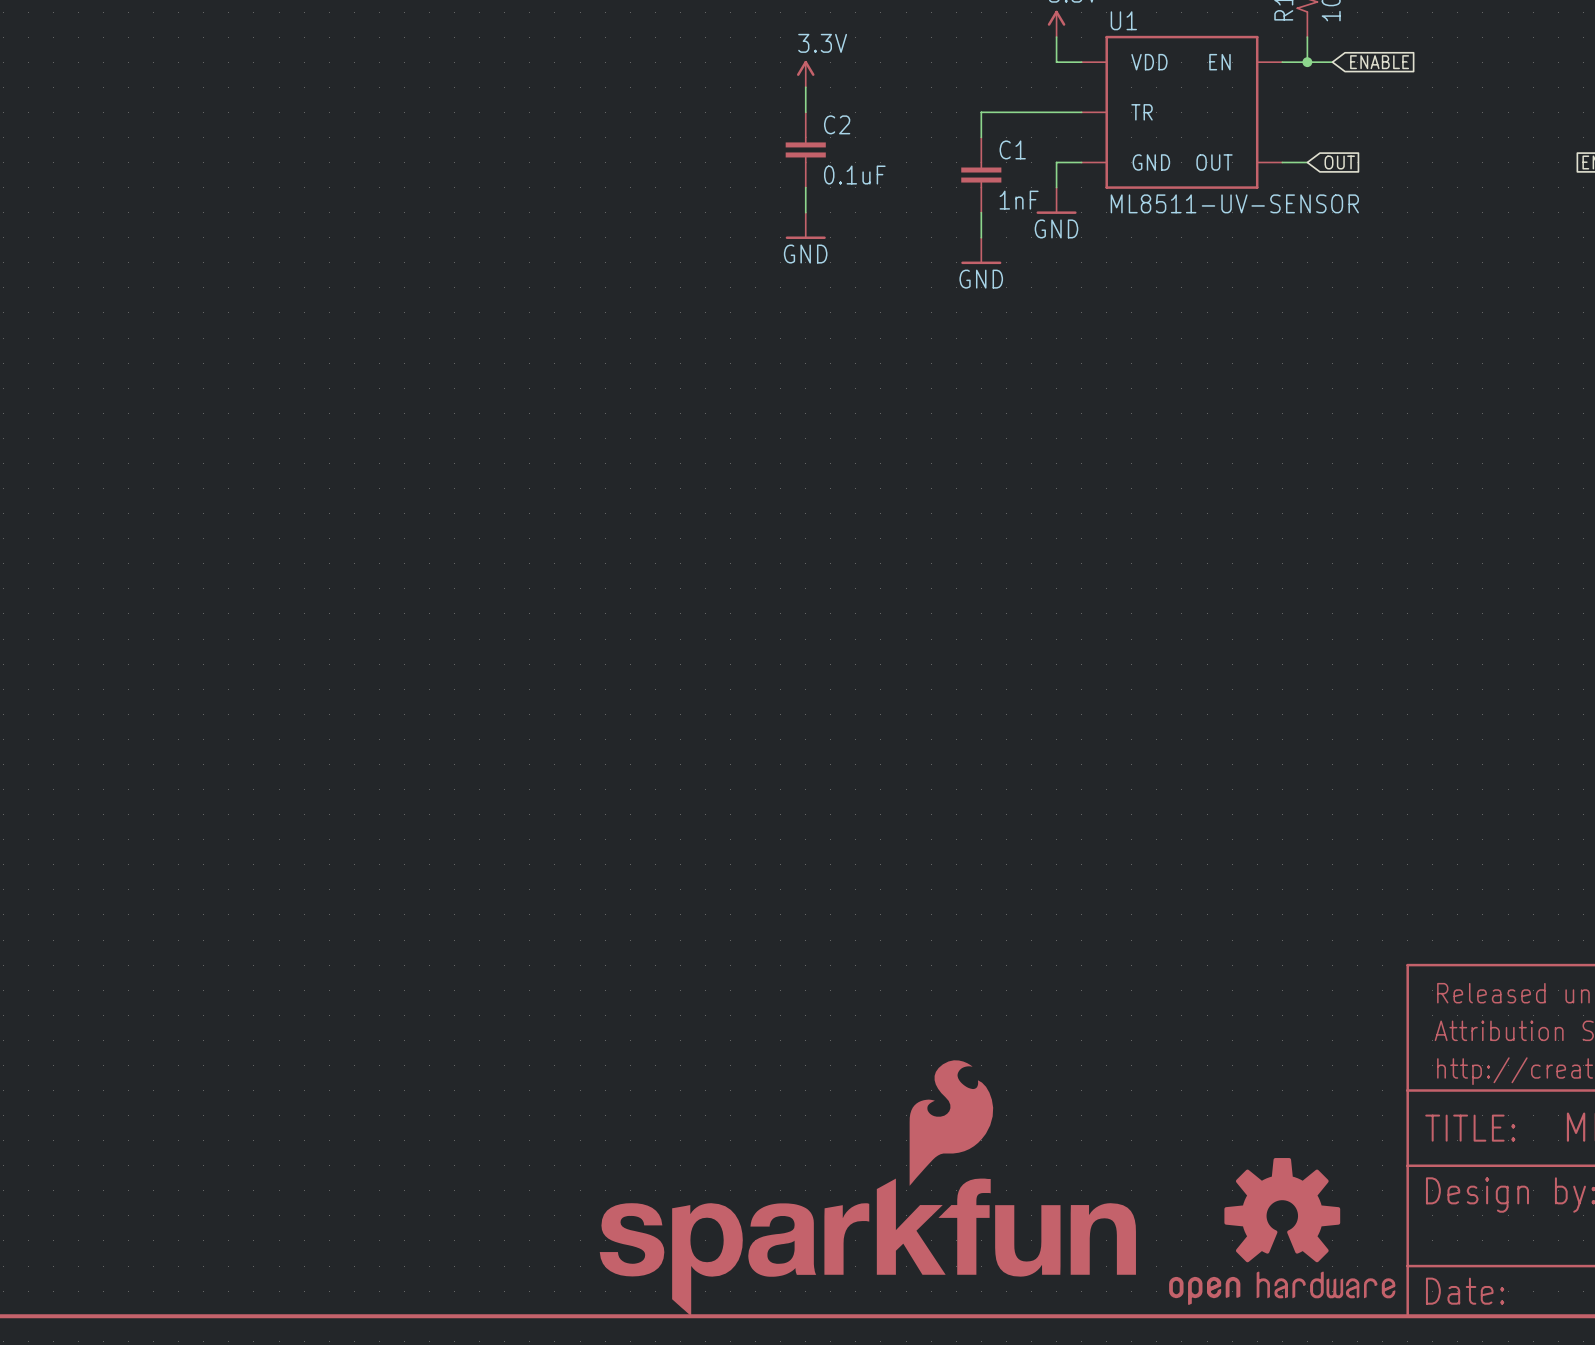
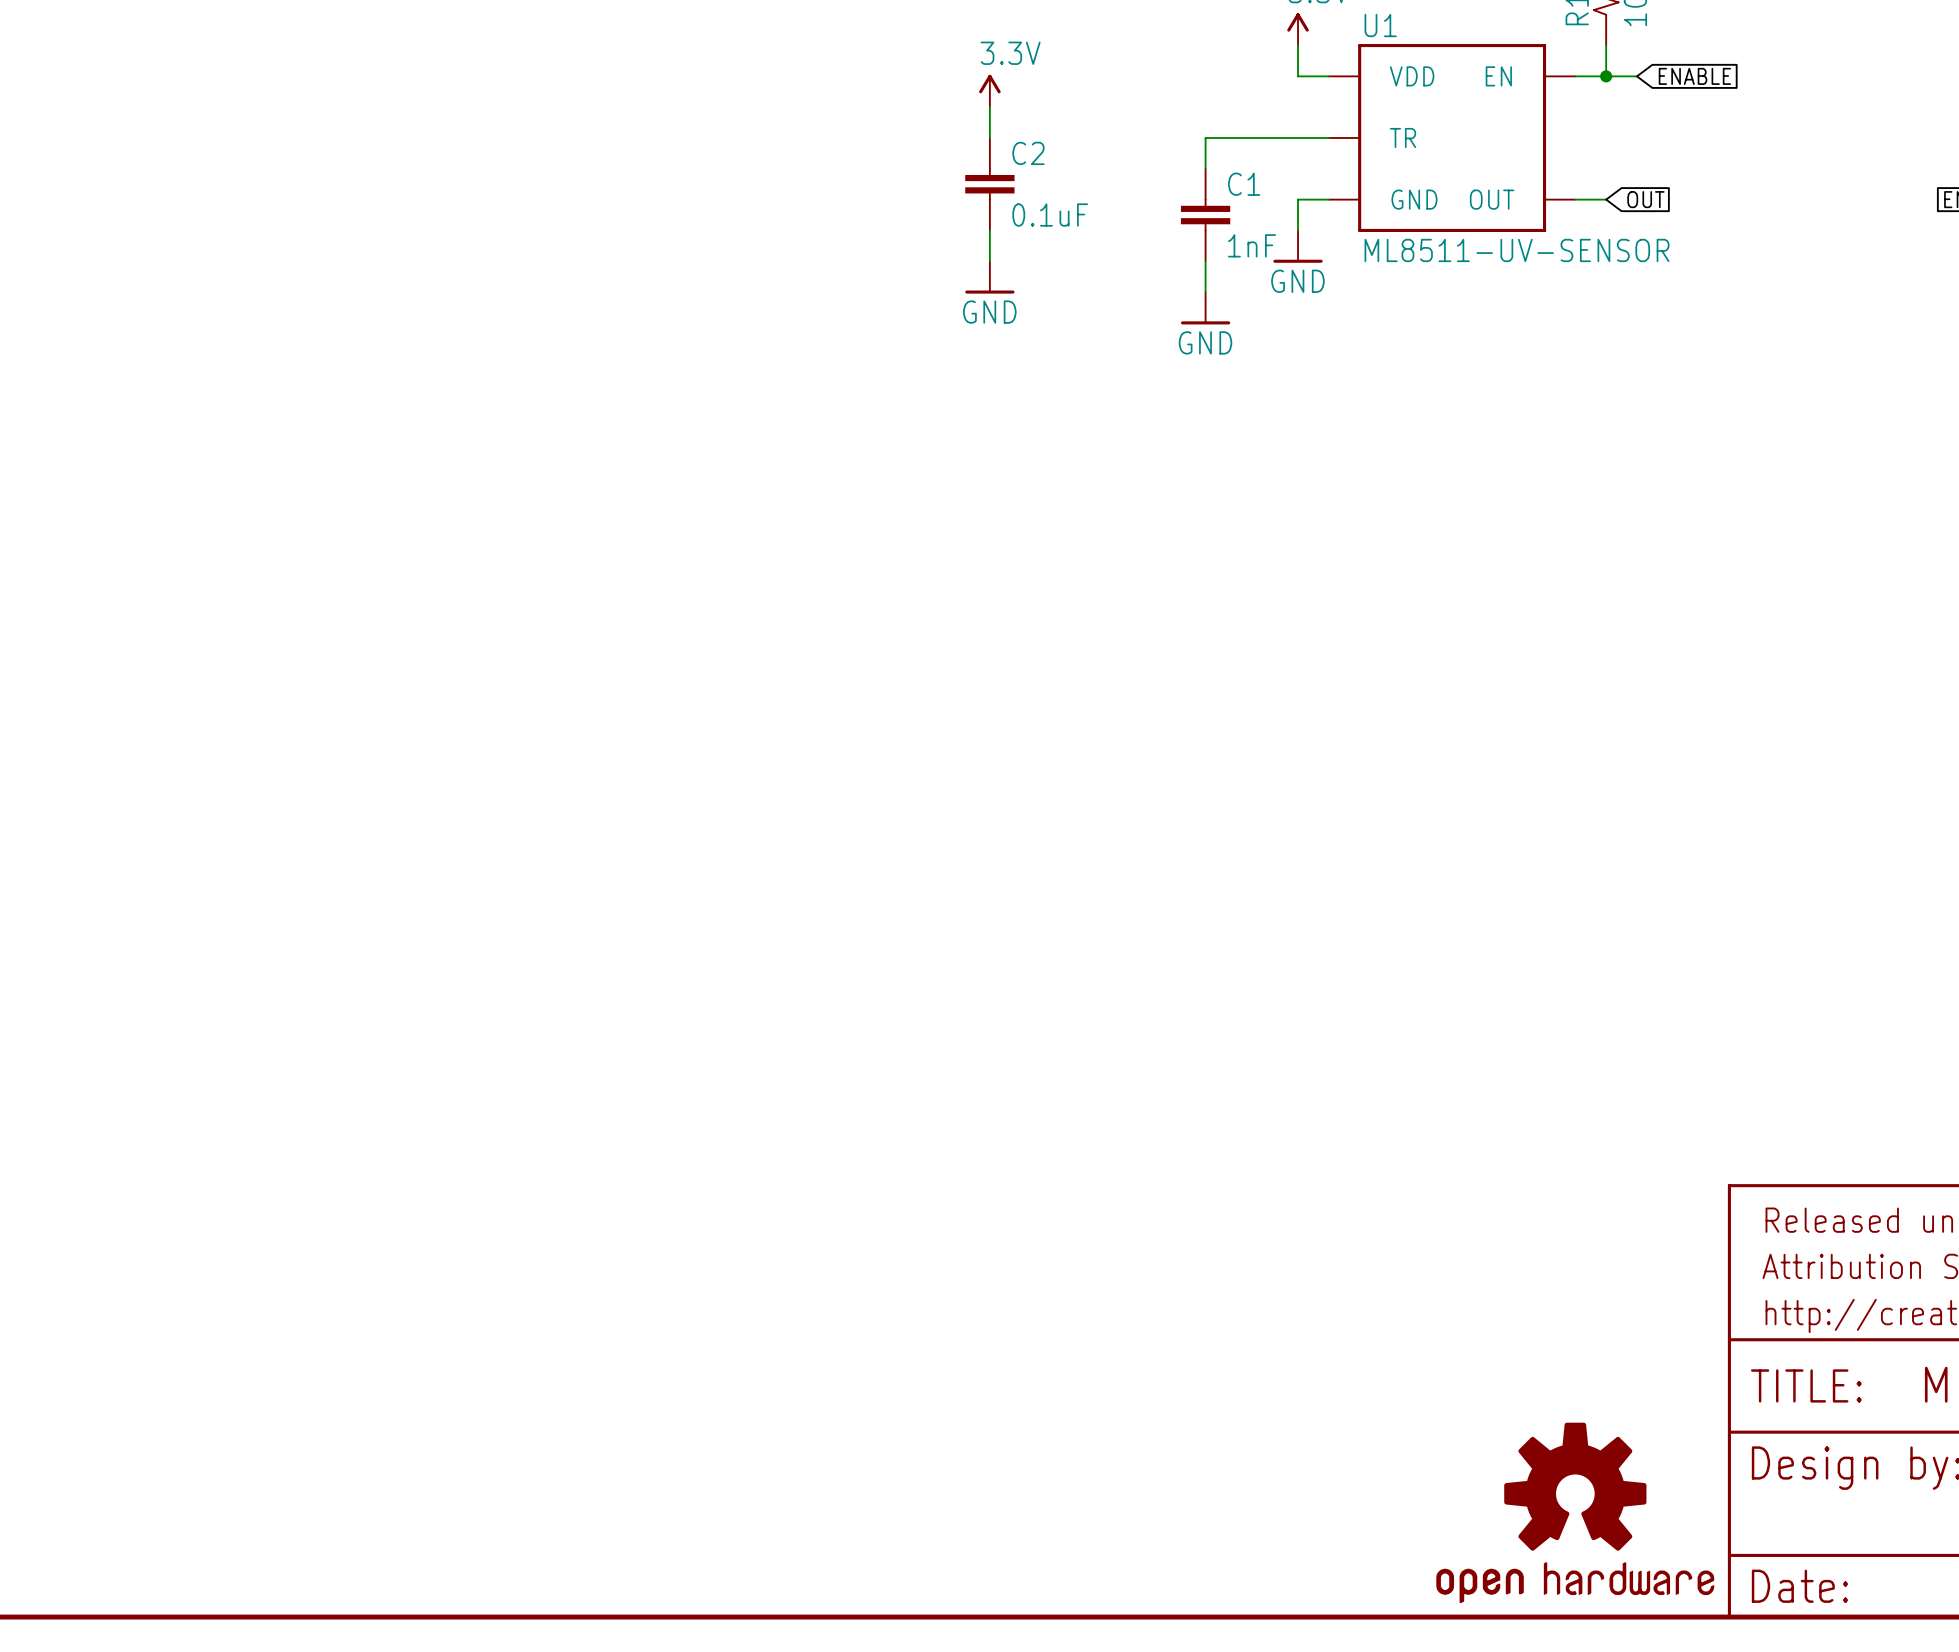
part: (951, 1123) -> none
part: (867, 1247) -> none

